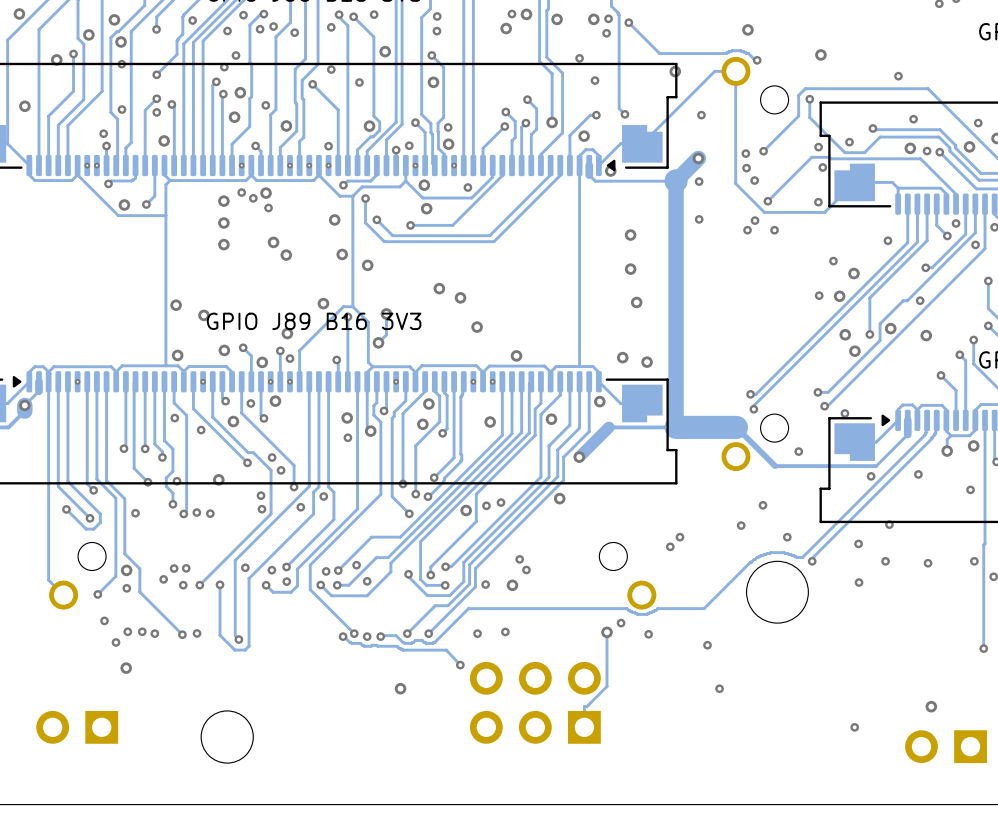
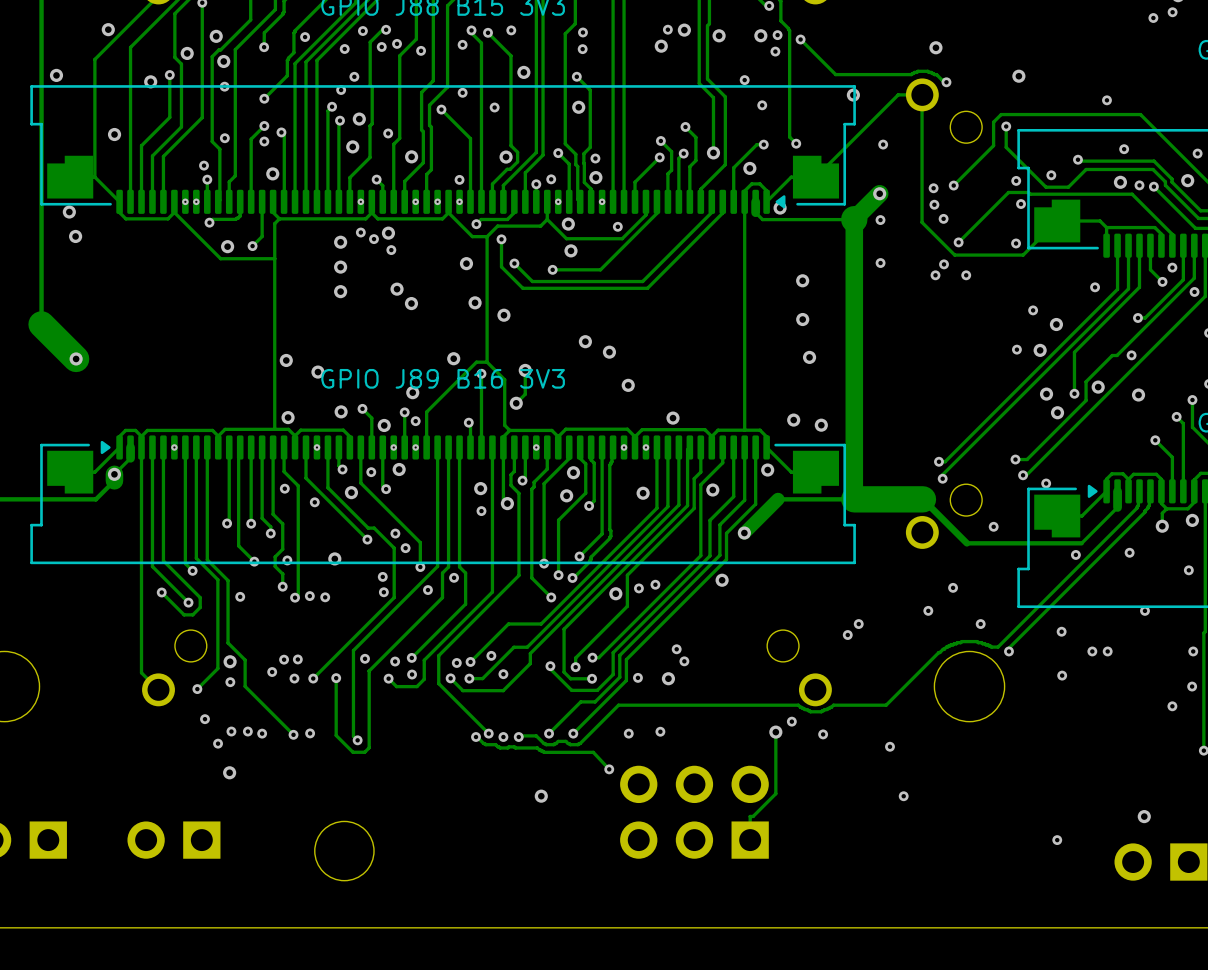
via: (889, 524) -> none
via: none -> (1144, 610)
via: none -> (1107, 651)
via: (928, 563) -> none
via: none -> (1192, 686)
via: none -> (1172, 706)

